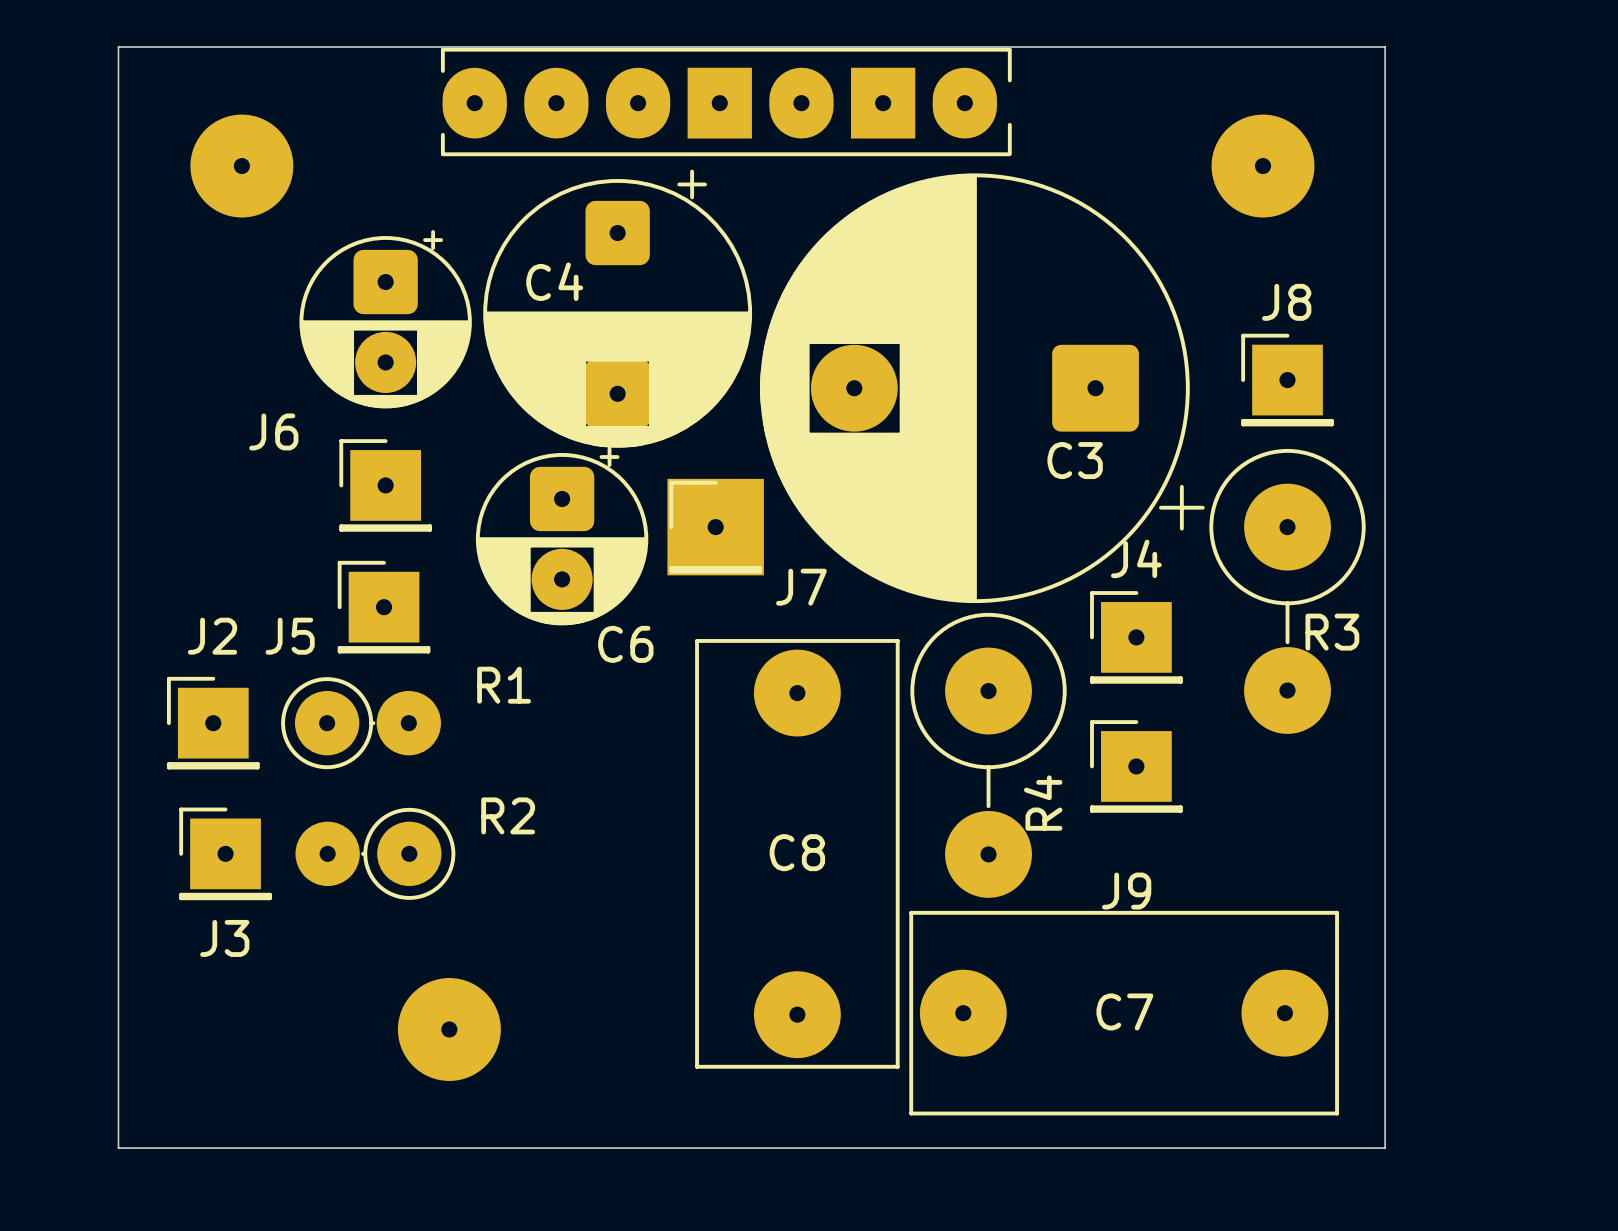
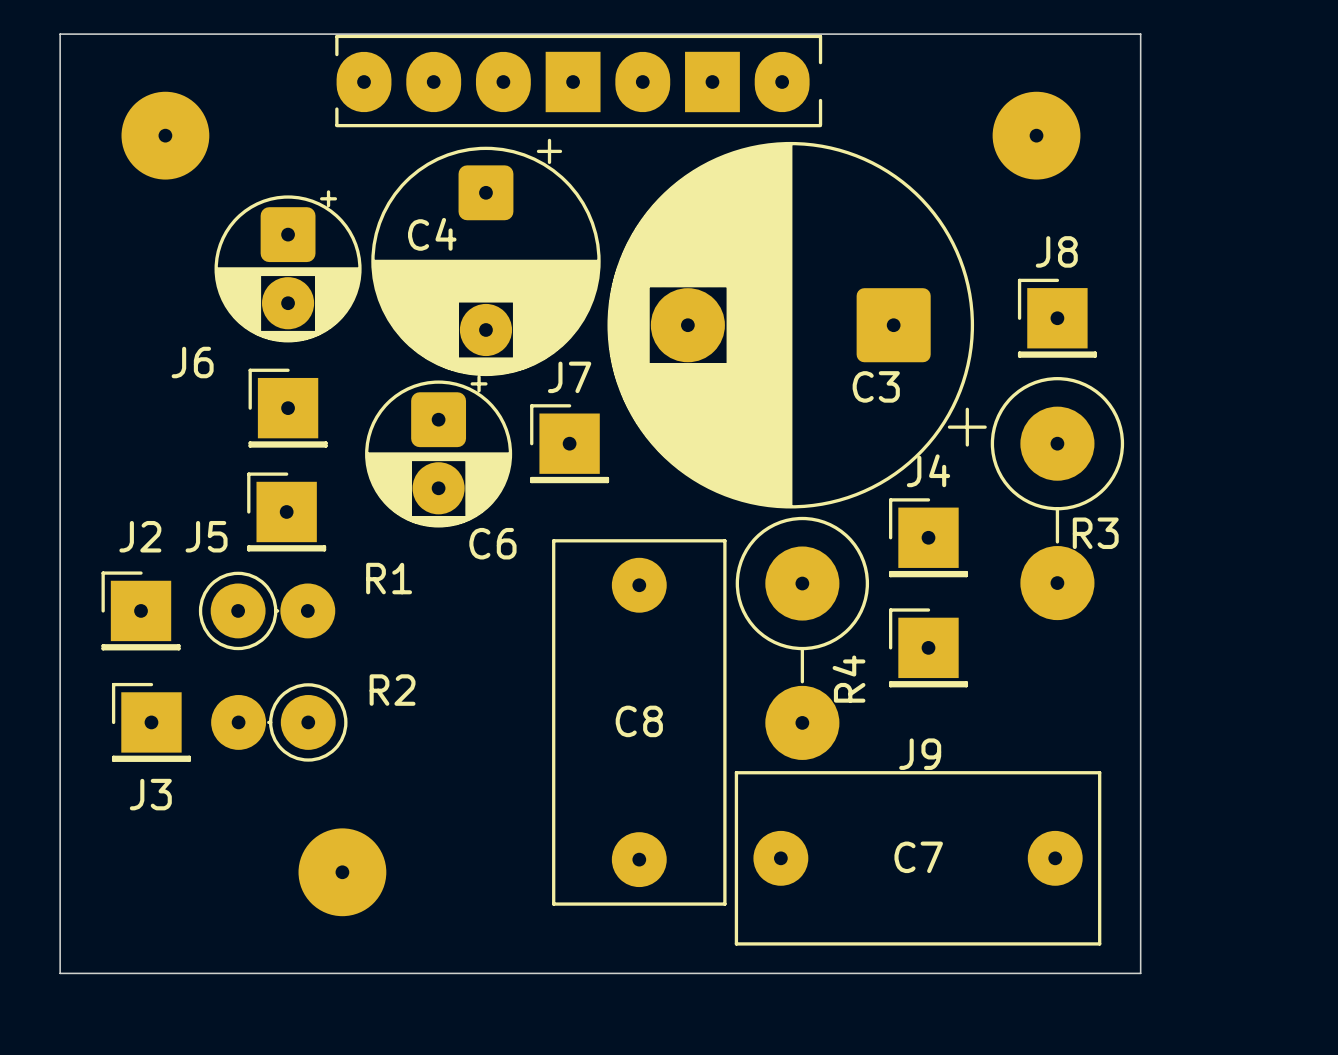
C4 footprint: [483, 169, 753, 448] -> [371, 138, 601, 377]
J7 footprint: [667, 478, 764, 576] -> [530, 404, 610, 484]
J7 name position: J7 (801, 587) -> J7 (569, 377)
C8 footprint: [695, 639, 900, 1069] -> [552, 539, 727, 906]
C7 footprint: [909, 910, 1339, 1116] -> [734, 771, 1102, 946]

